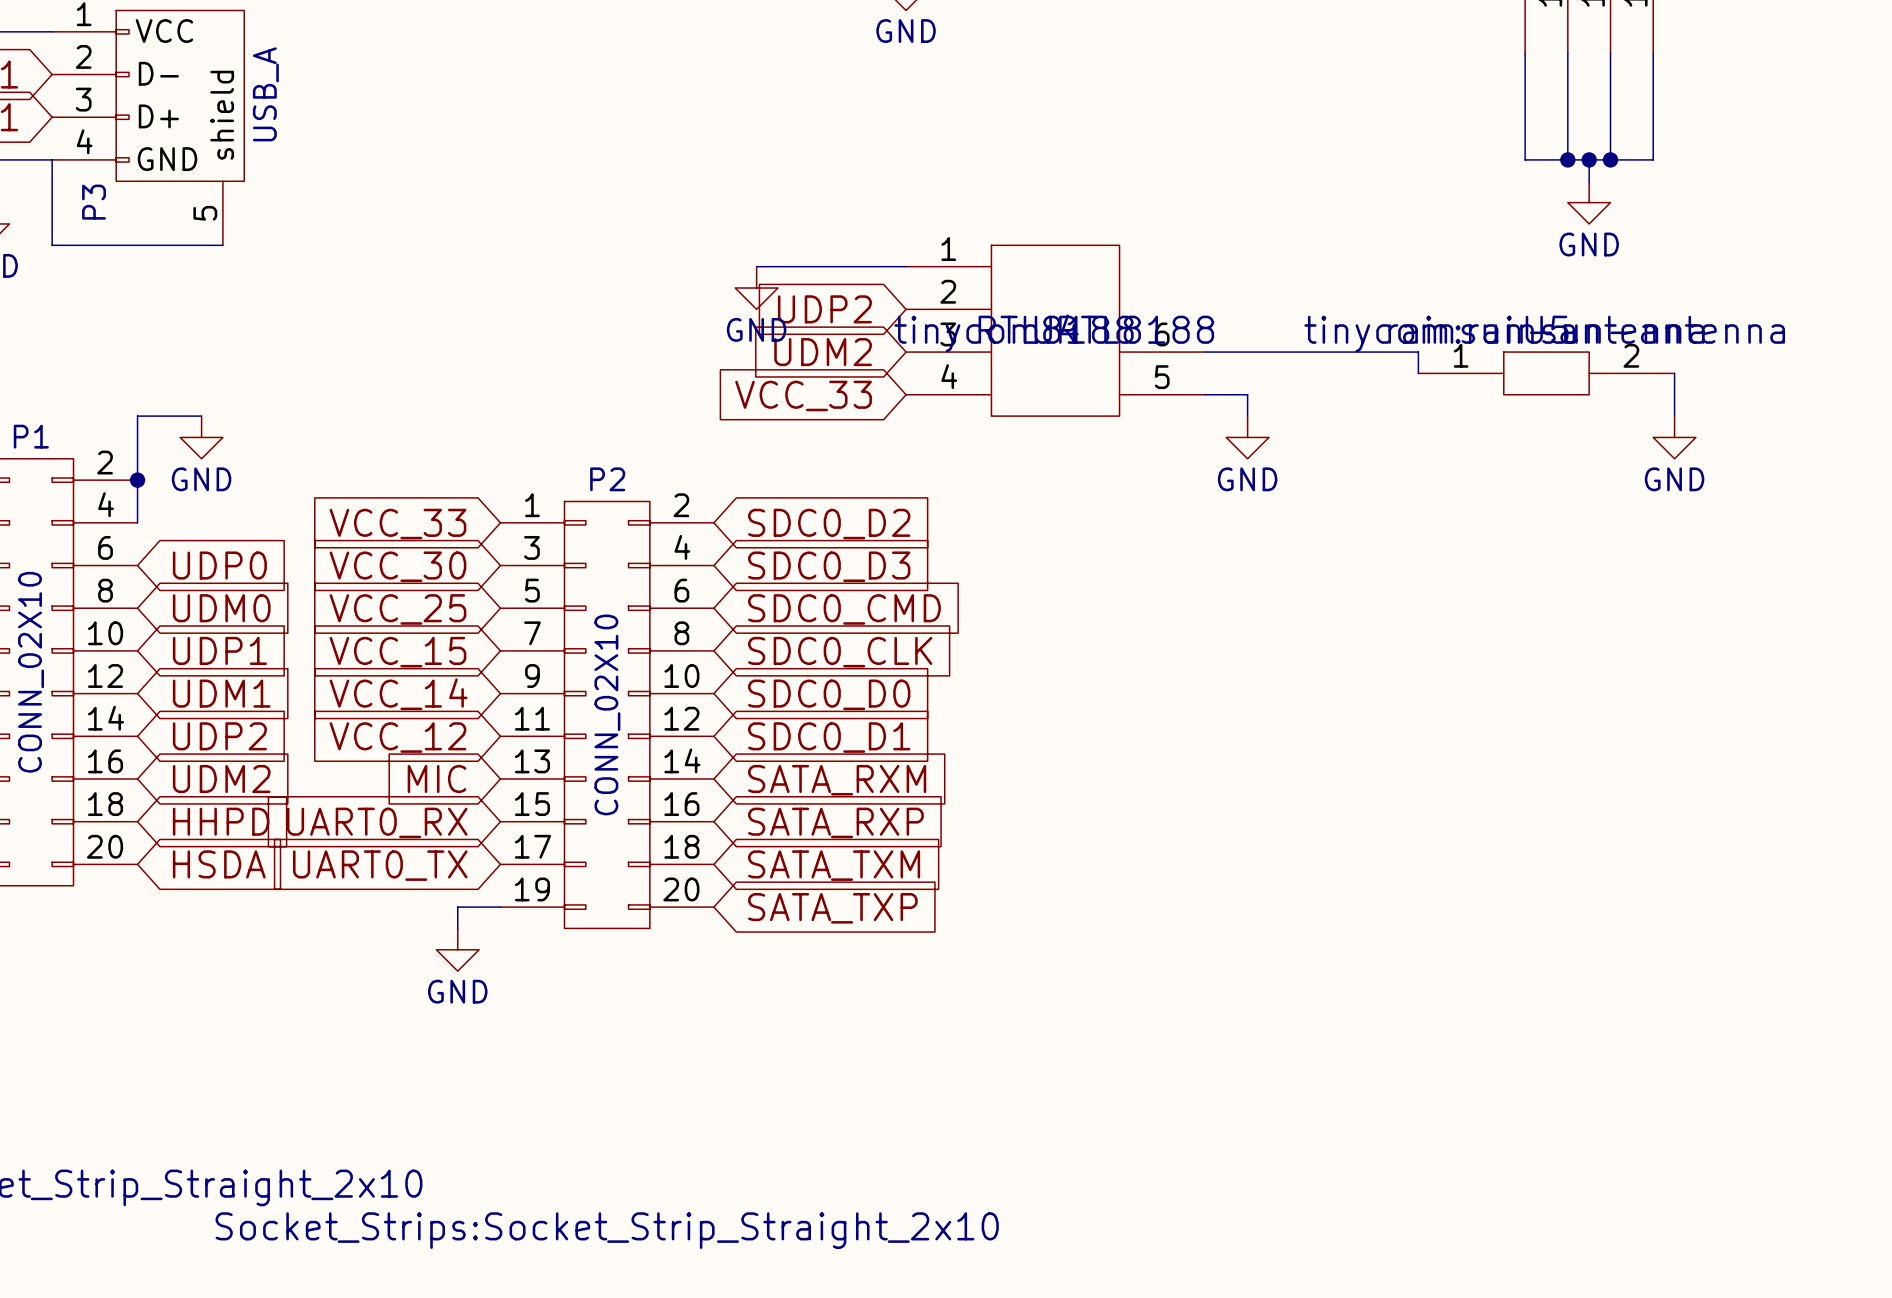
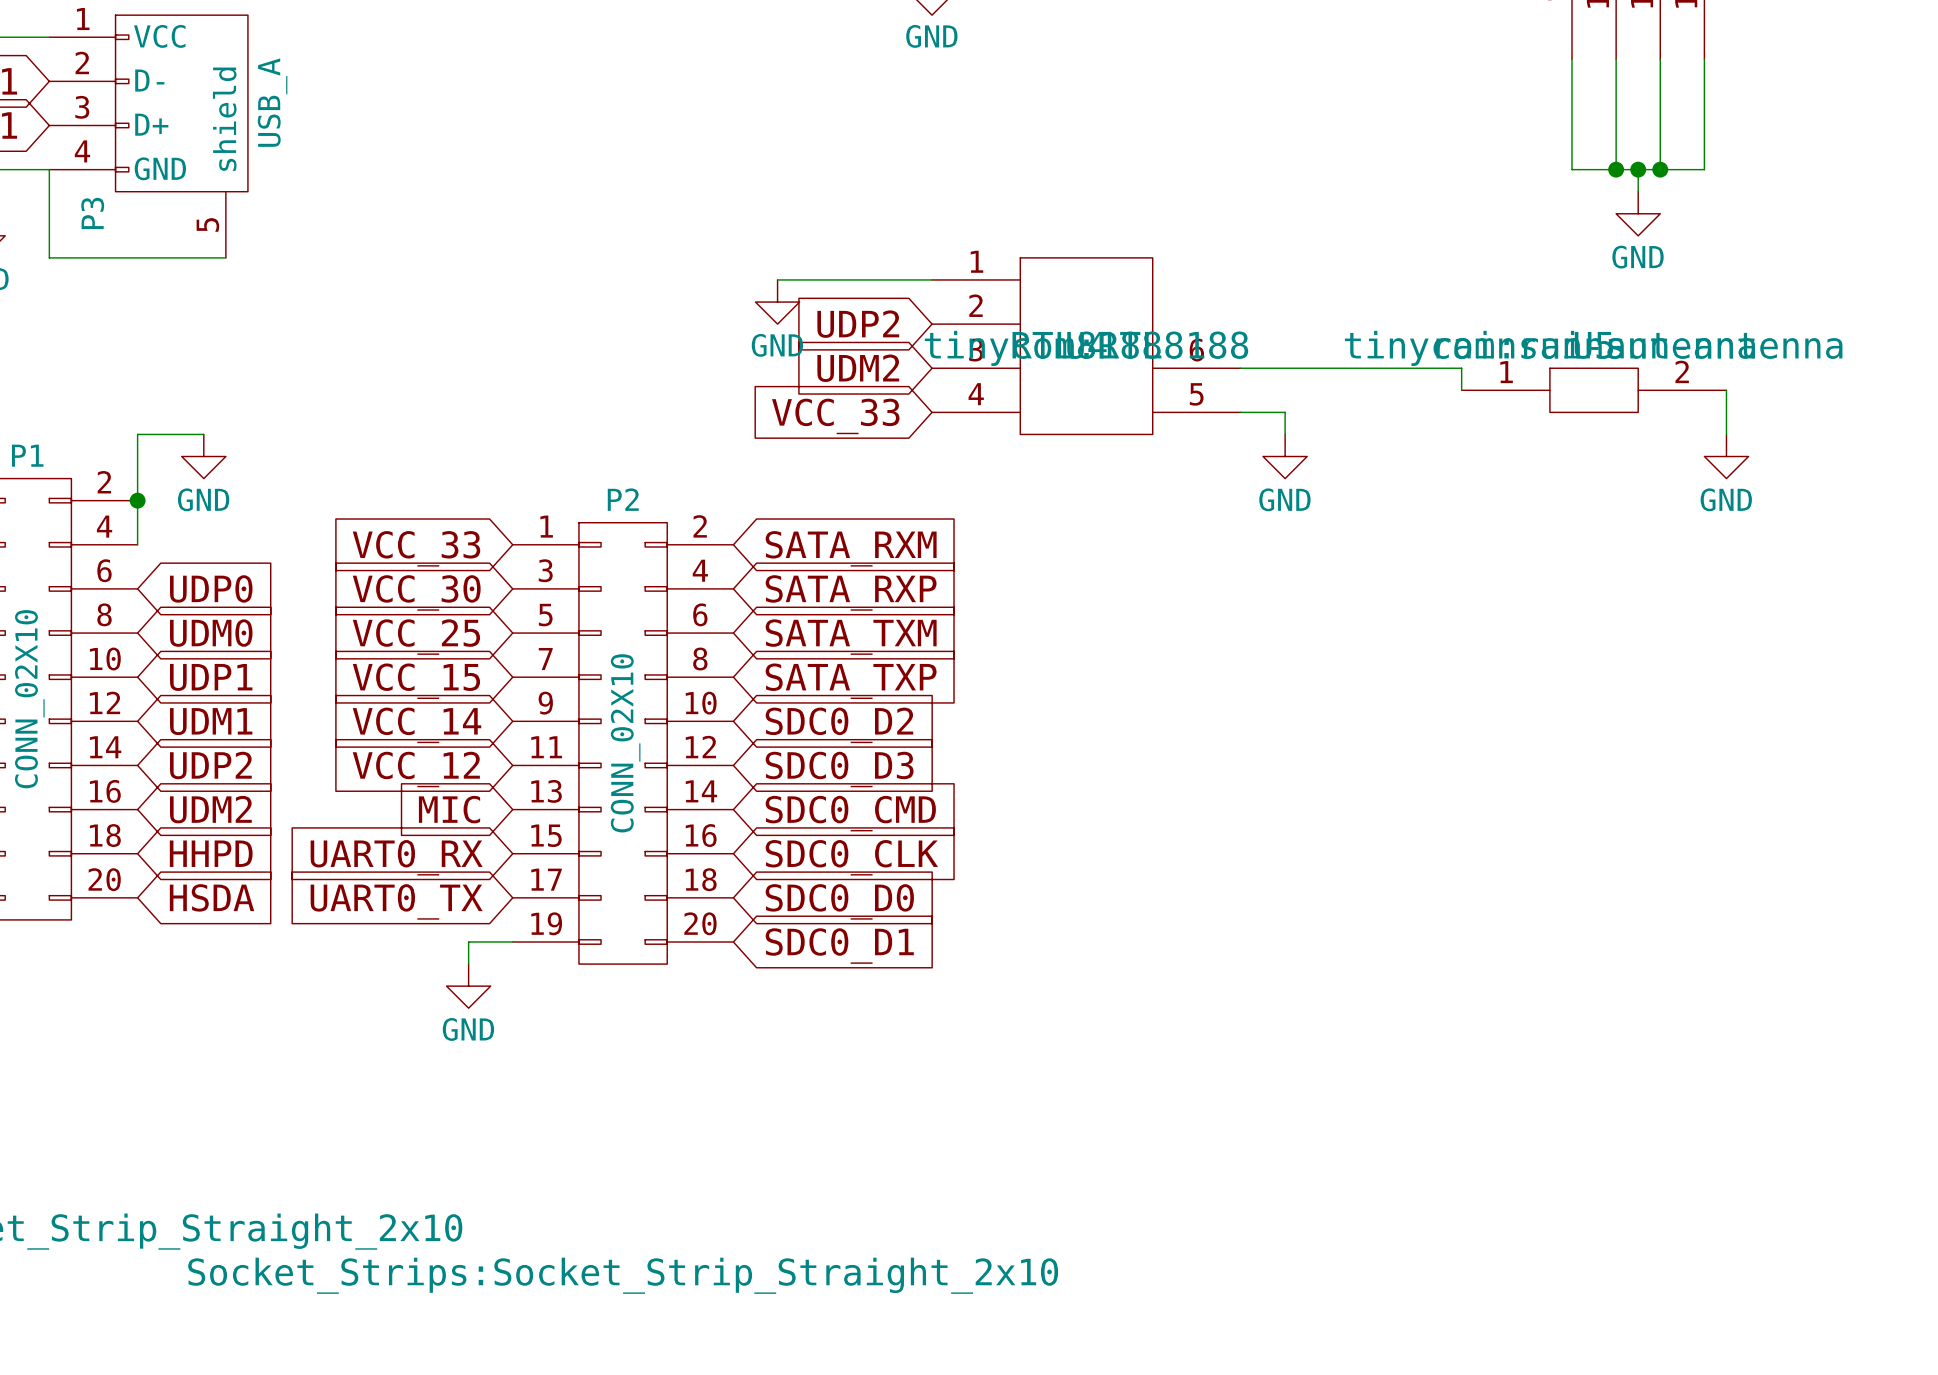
global label: SDC0_D2 (829, 524) -> SATA_RXM (851, 548)
global label: SDC0_D3 (829, 566) -> SATA_RXP (851, 592)
global label: SDC0_CMD (844, 609) -> SATA_TXM (851, 637)
global label: SDC0_CLK (840, 652) -> SATA_TXP (851, 681)
global label: SDC0_D0 (829, 694) -> SDC0_D2 (839, 725)
global label: SDC0_D1 (829, 737) -> SDC0_D3 (839, 769)
global label: SATA_RXM (837, 780) -> SDC0_CMD (850, 813)
global label: SATA_RXP (835, 822) -> SDC0_CLK (851, 857)
global label: SATA_TXM (834, 865) -> SDC0_D0 (839, 901)
global label: SATA_TXP (832, 908) -> SDC0_D1 (839, 946)

